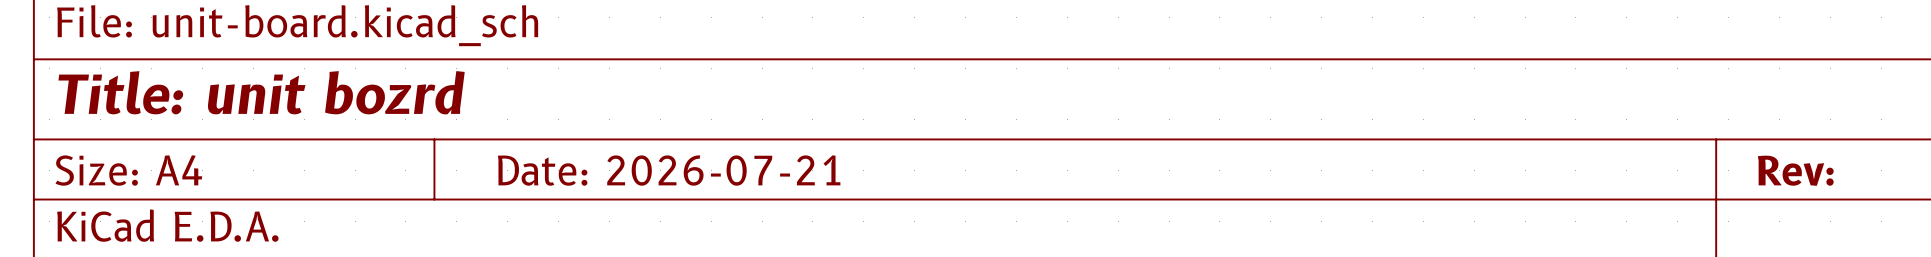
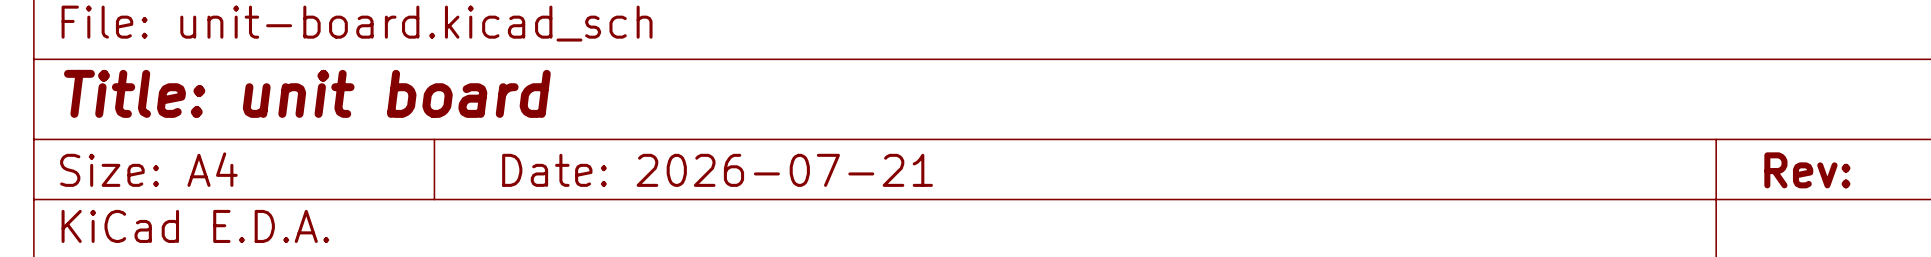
title block: Title: unit bozrd (261, 92) -> Title: unit board (307, 93)

